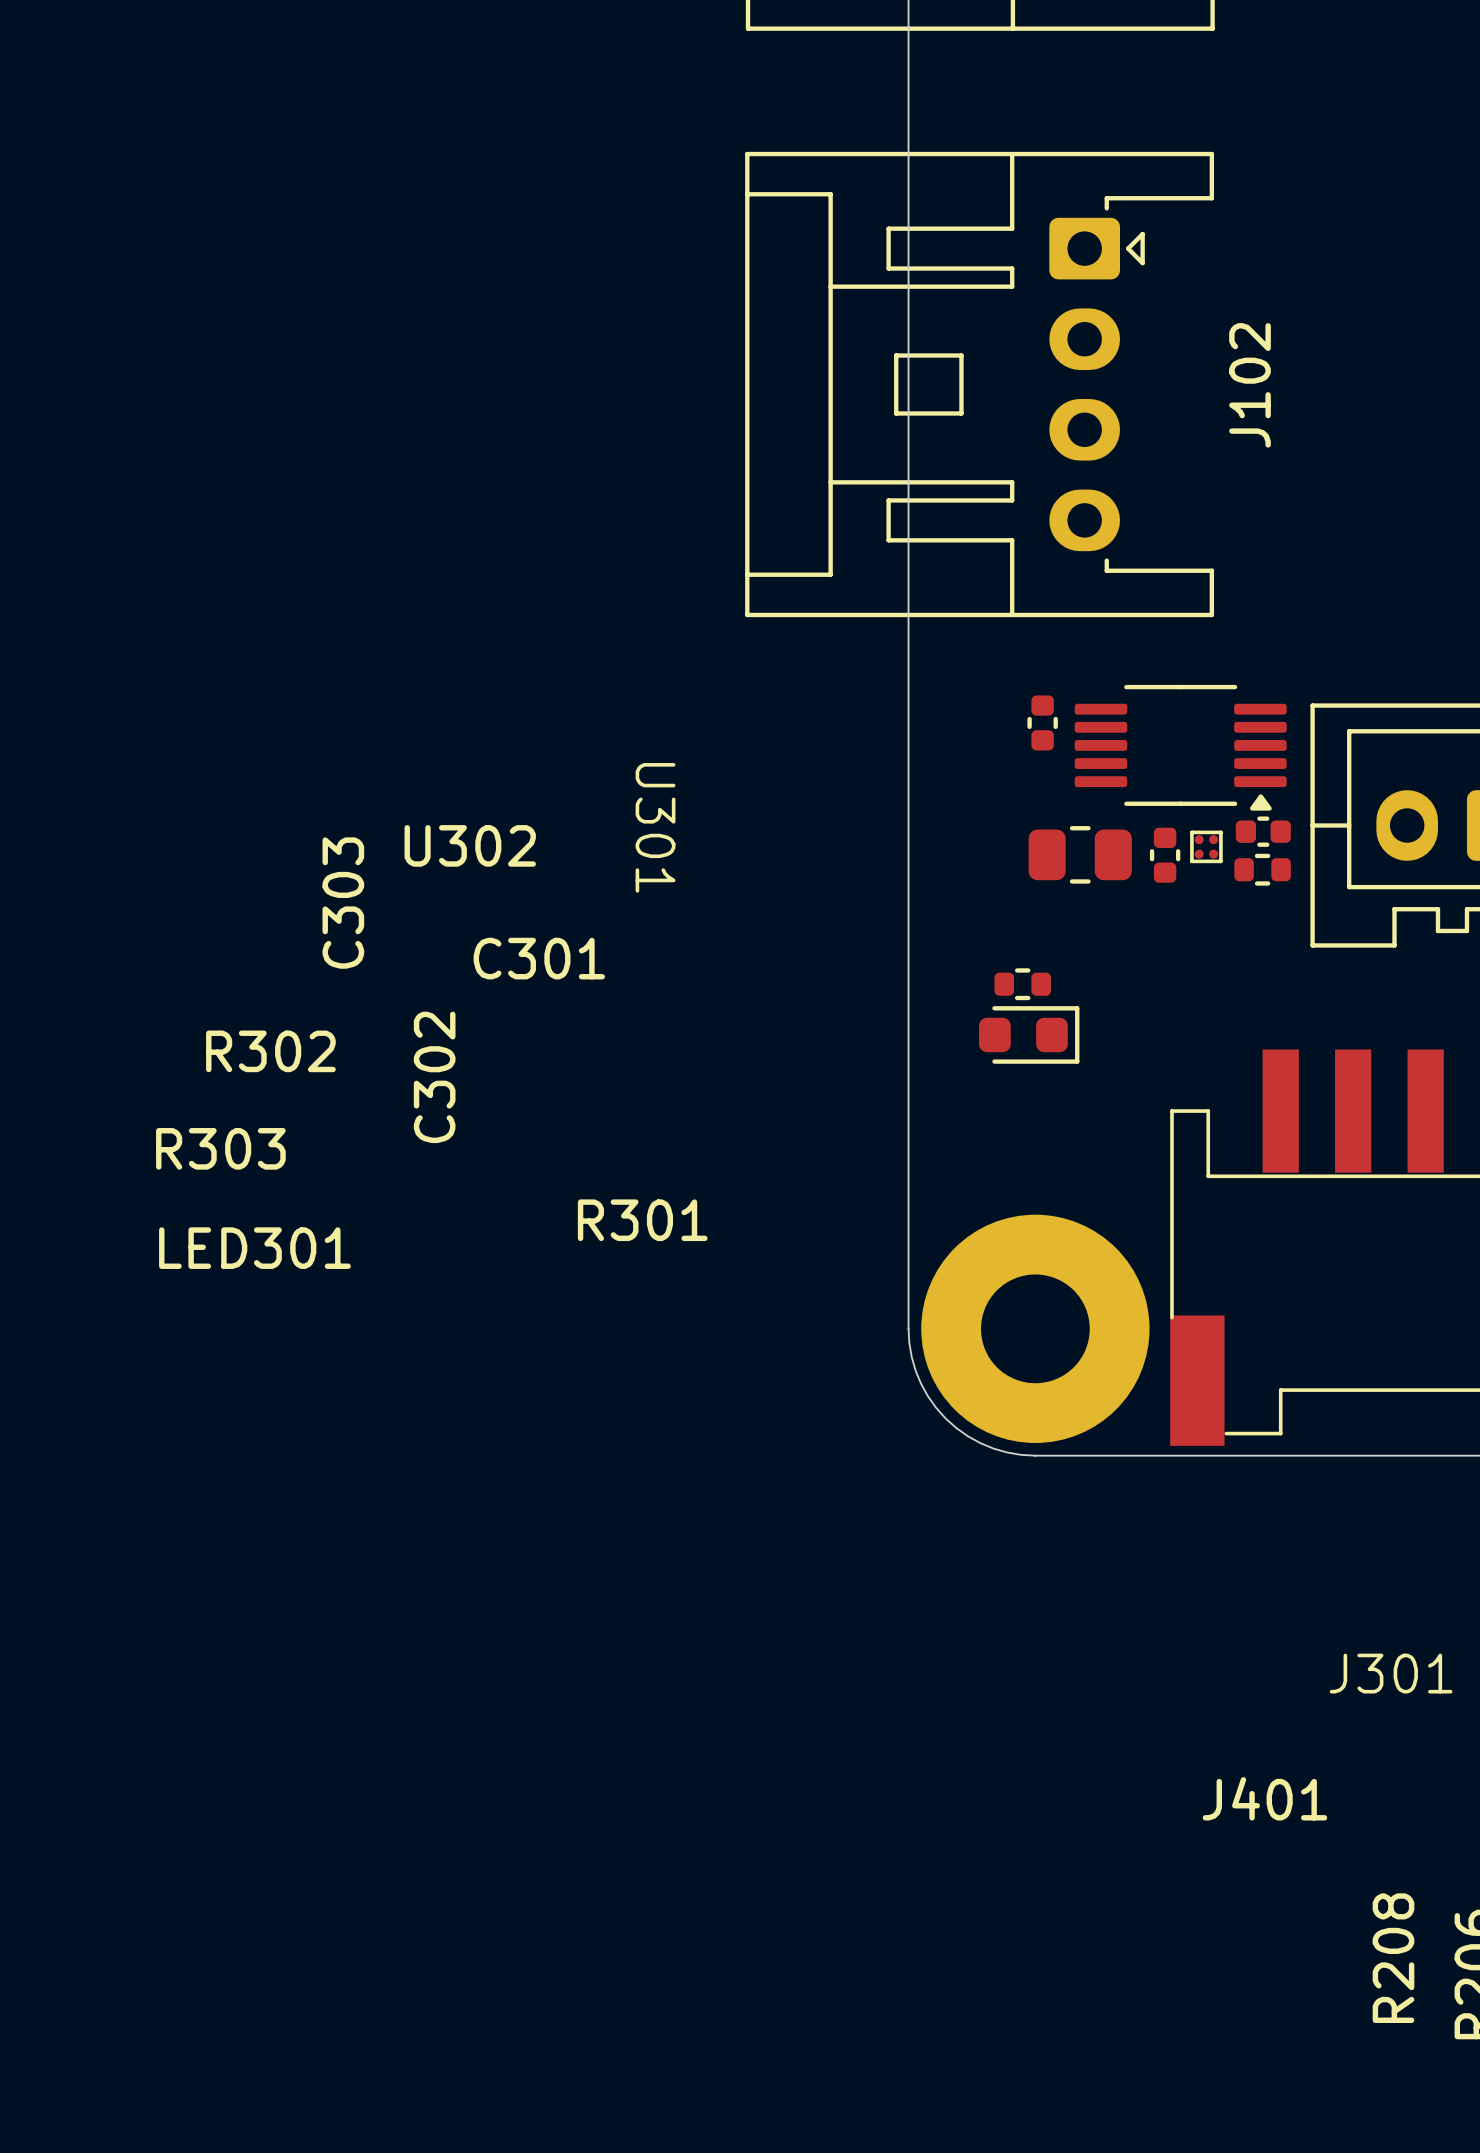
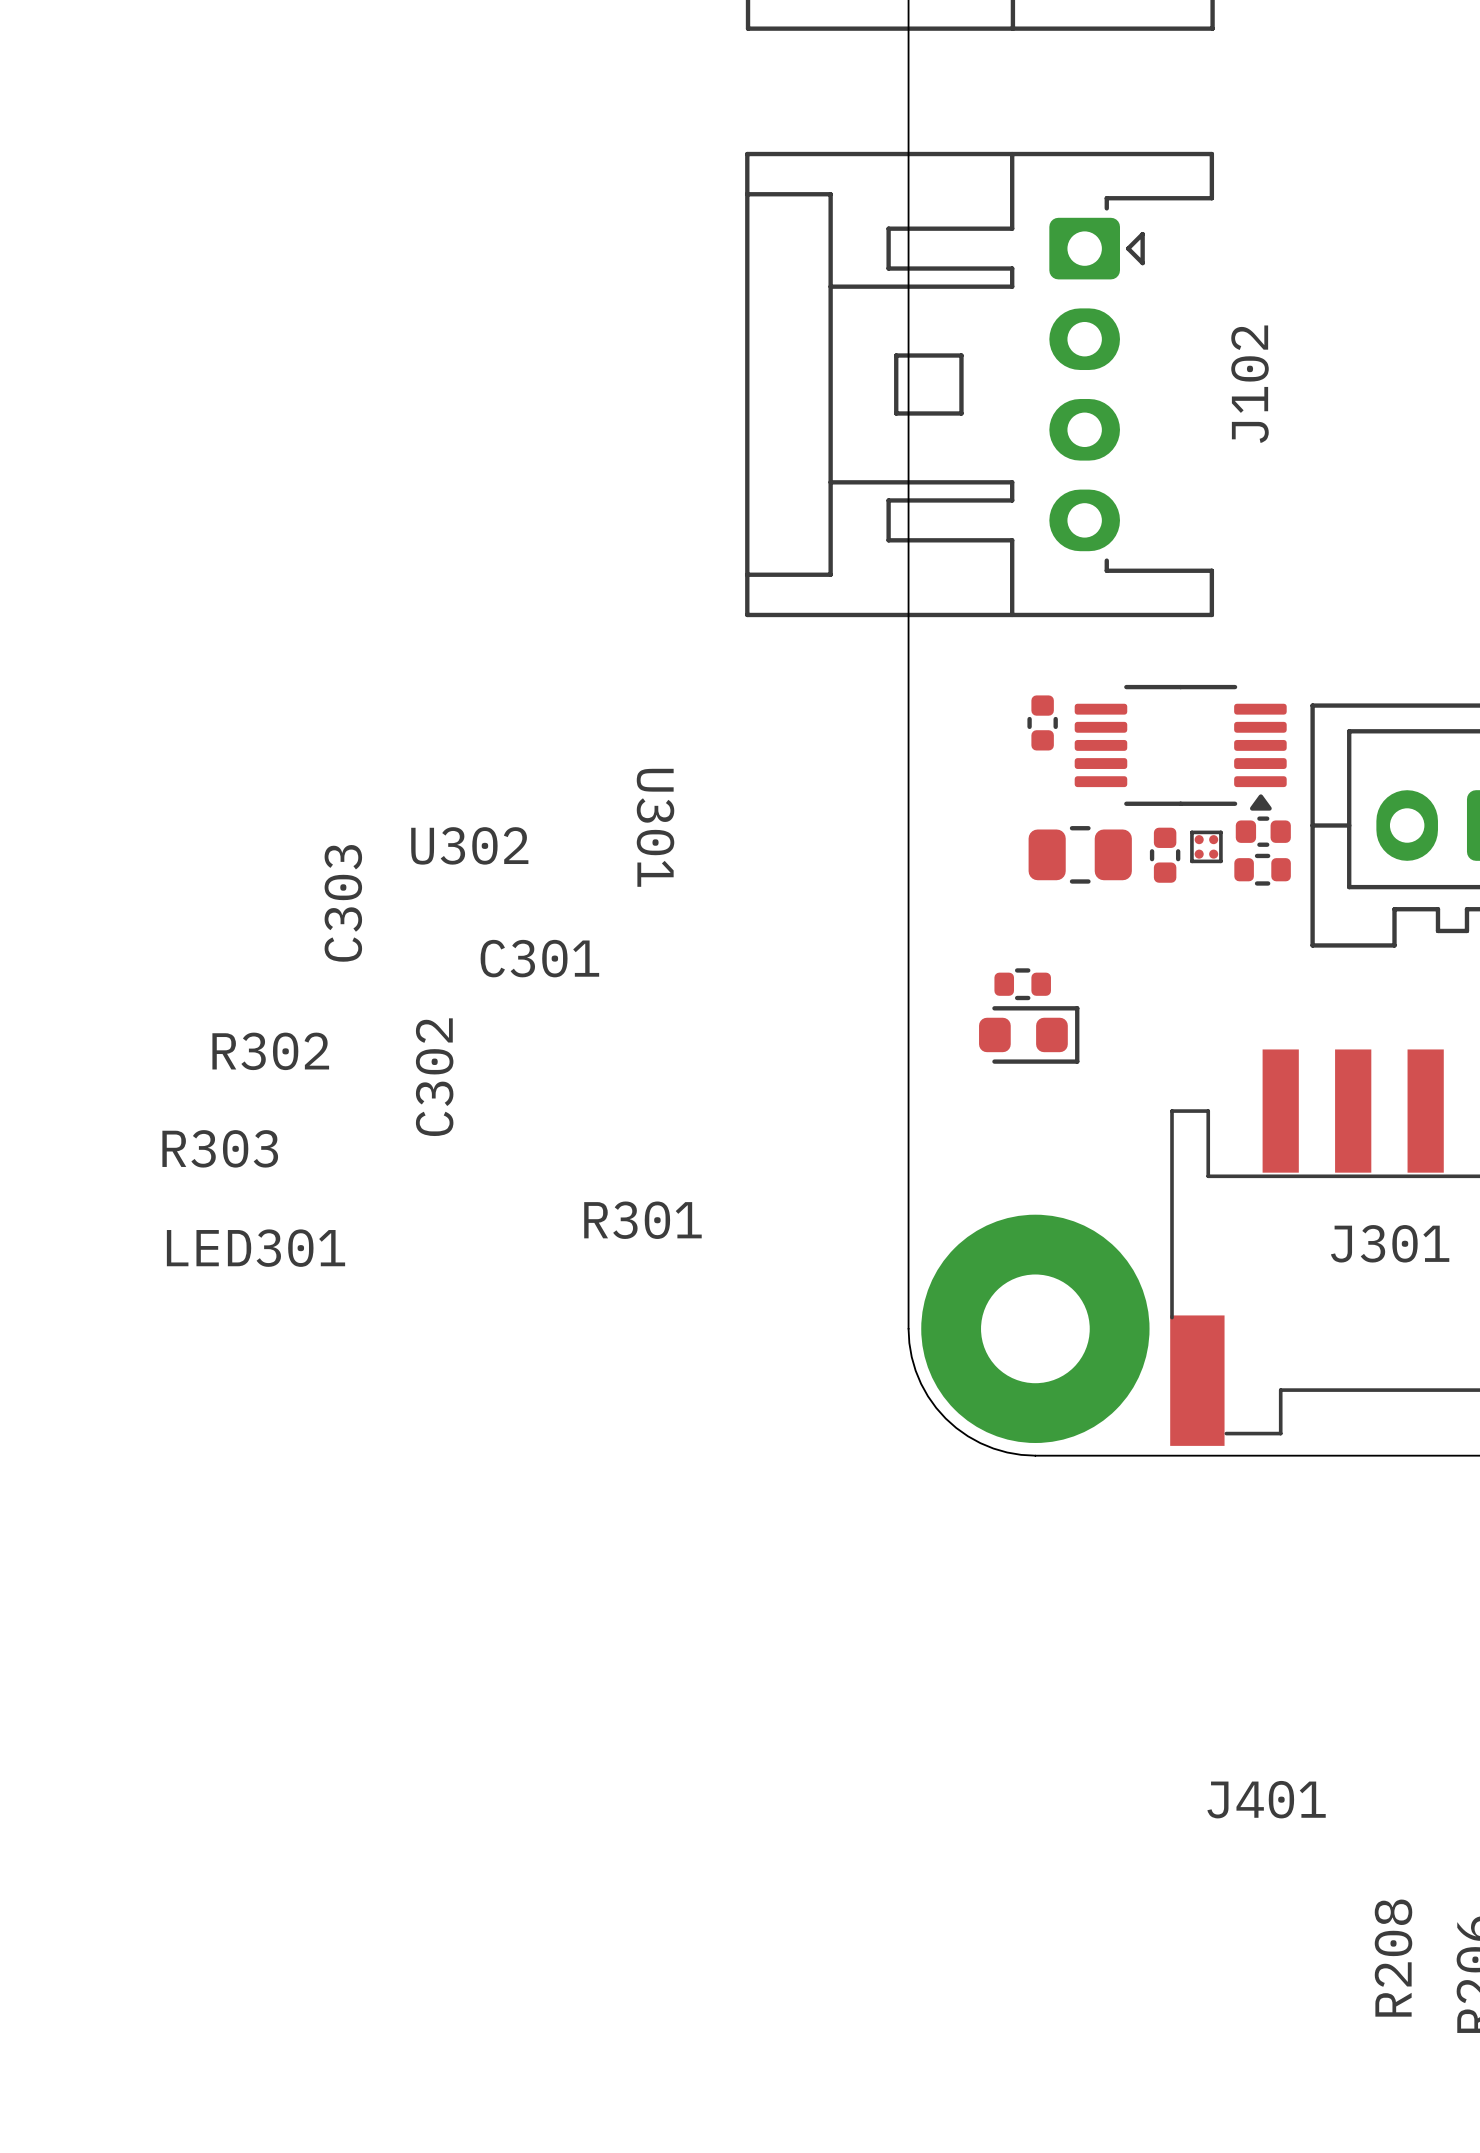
J301 name position: J301 (1391, 1673) -> J301 (1390, 1243)

